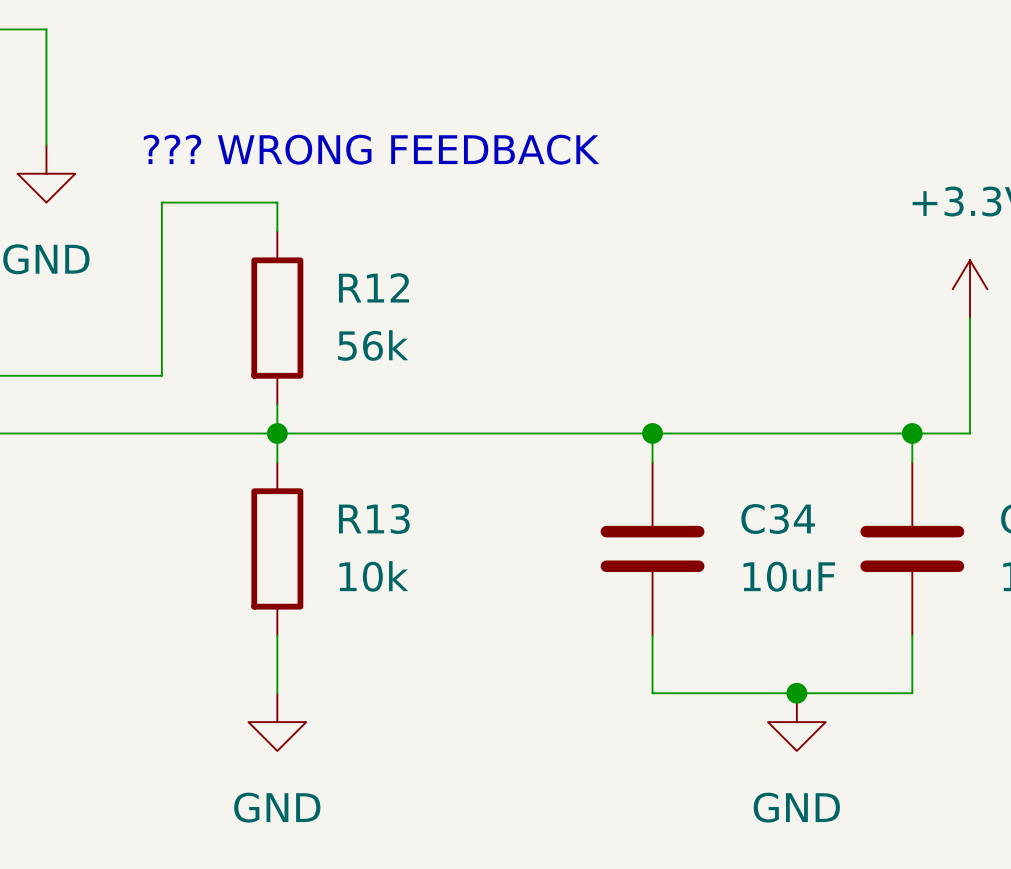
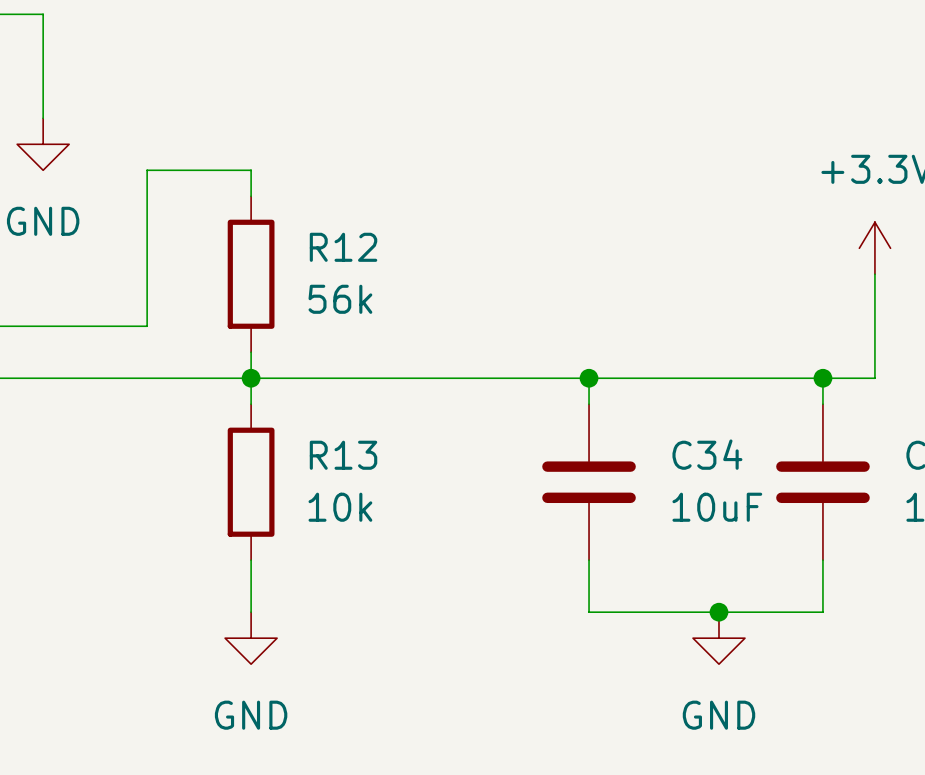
text: ??? WRONG FEEDBACK (371, 149) -> none

